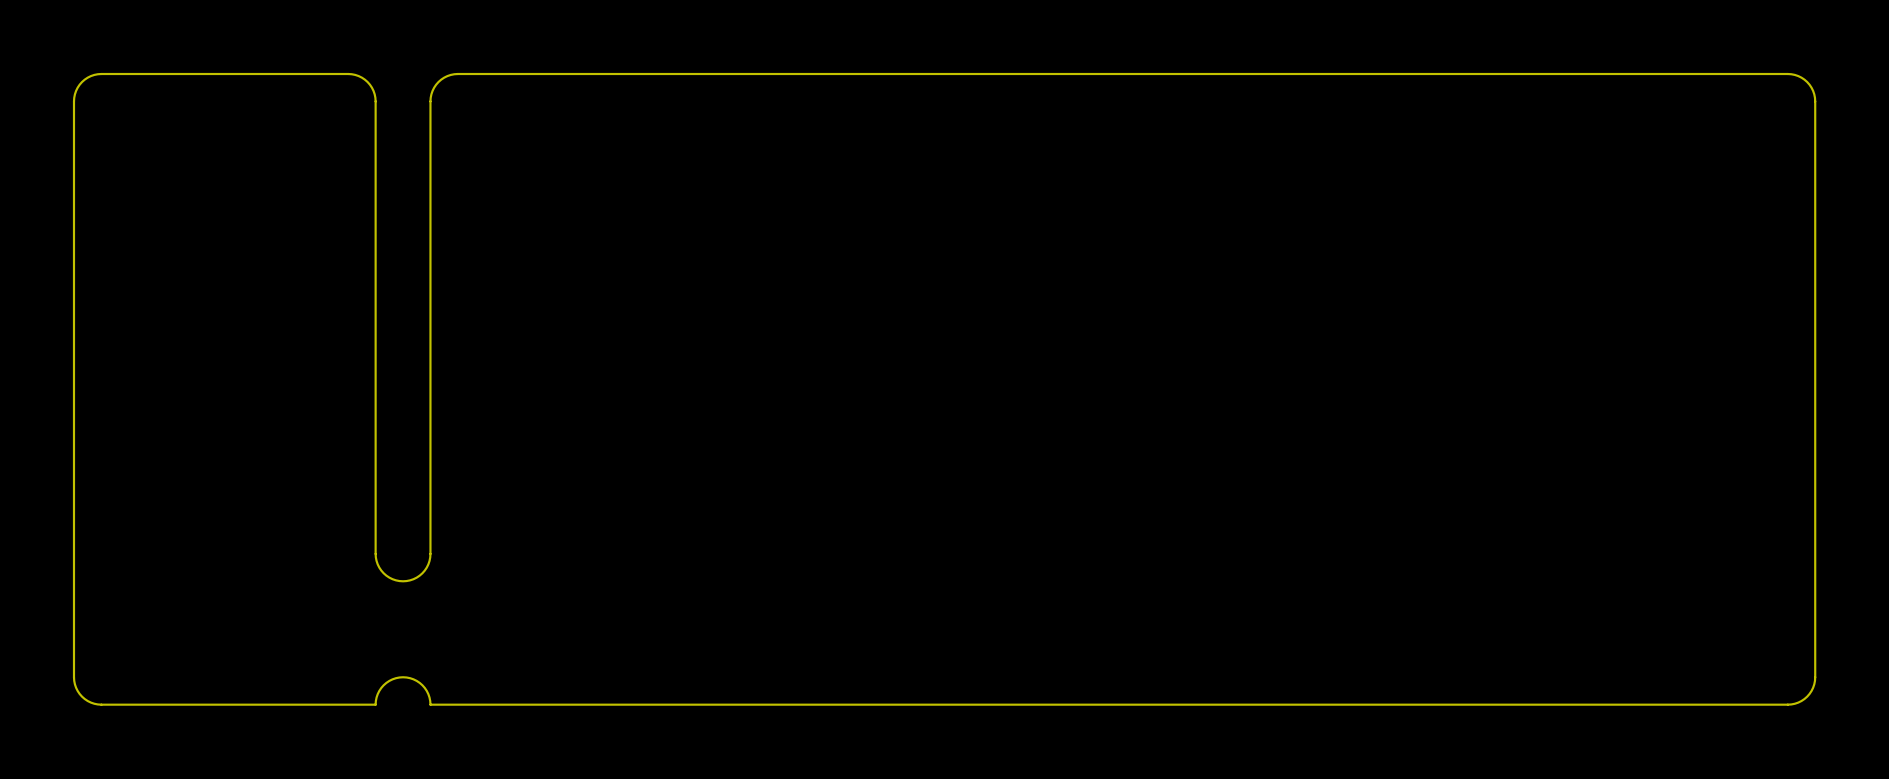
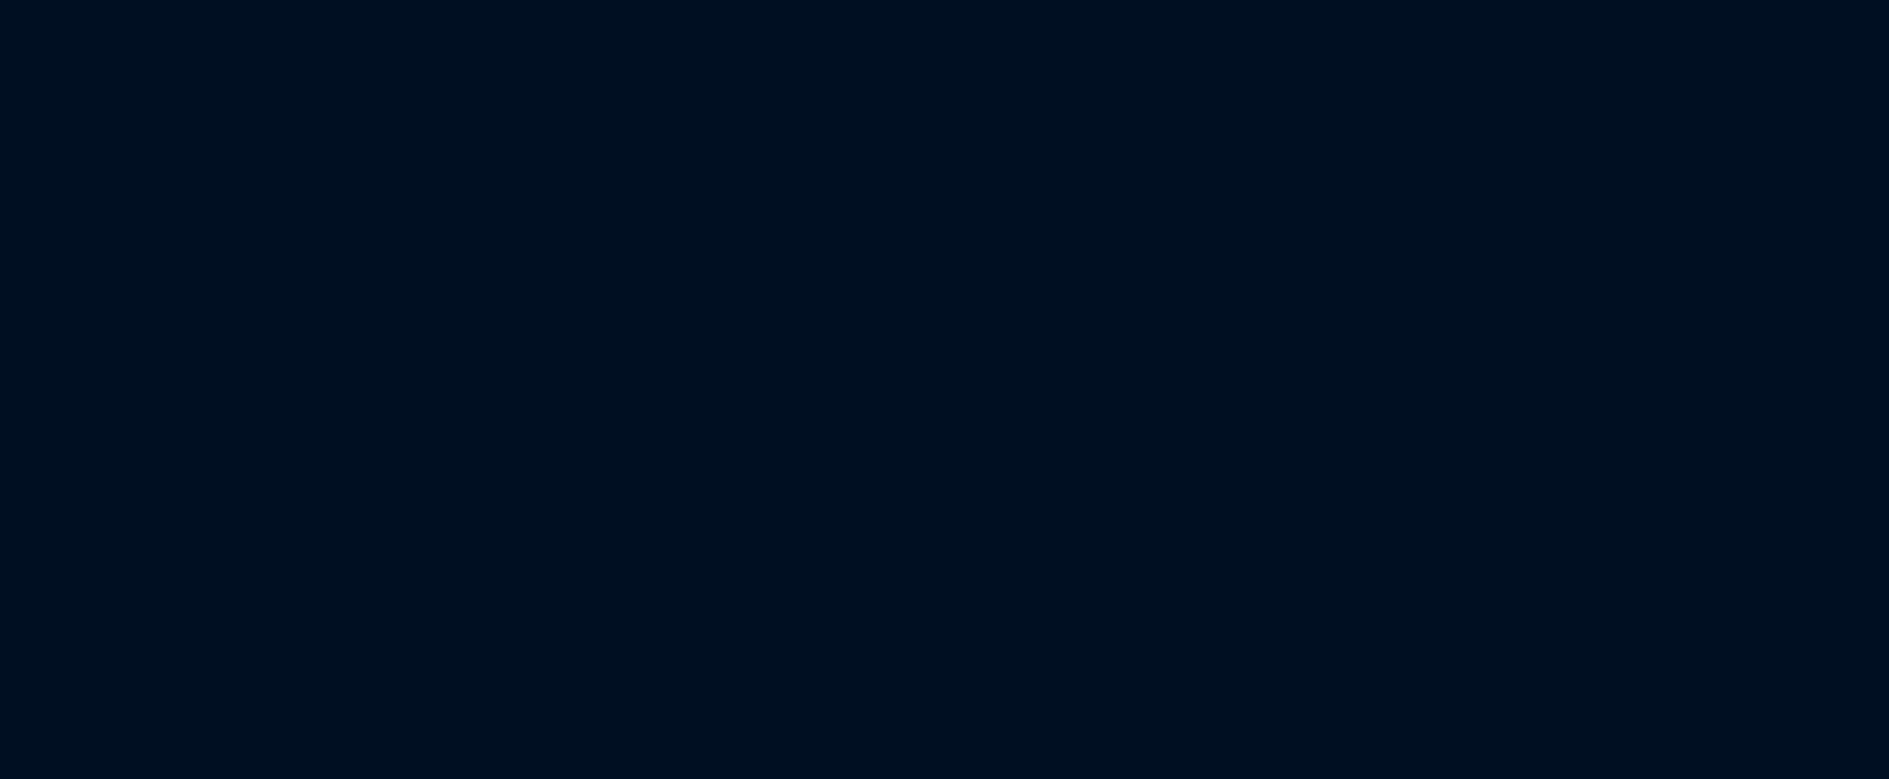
board edge: (74, 101) (74, 677) (76, 687) (82, 696) (90, 702) (101, 704) -> none
board edge: (74, 101) (76, 90) (82, 82) (90, 76) (101, 74) (348, 74) (361, 77) (369, 84) (375, 101) (375, 557) (379, 567) (386, 575) (403, 581) (419, 575) (426, 567) (430, 557) (430, 101) (434, 87) (447, 76) (457, 74) (1787, 74) (1798, 76) (1807, 82) (1813, 90) (1815, 101) (1815, 677) (1809, 693) (1798, 702) (1787, 704) (430, 704) (428, 694) (422, 685) (413, 679) (403, 677) (392, 679) (383, 685) (377, 694) (375, 704) (101, 704) -> none

